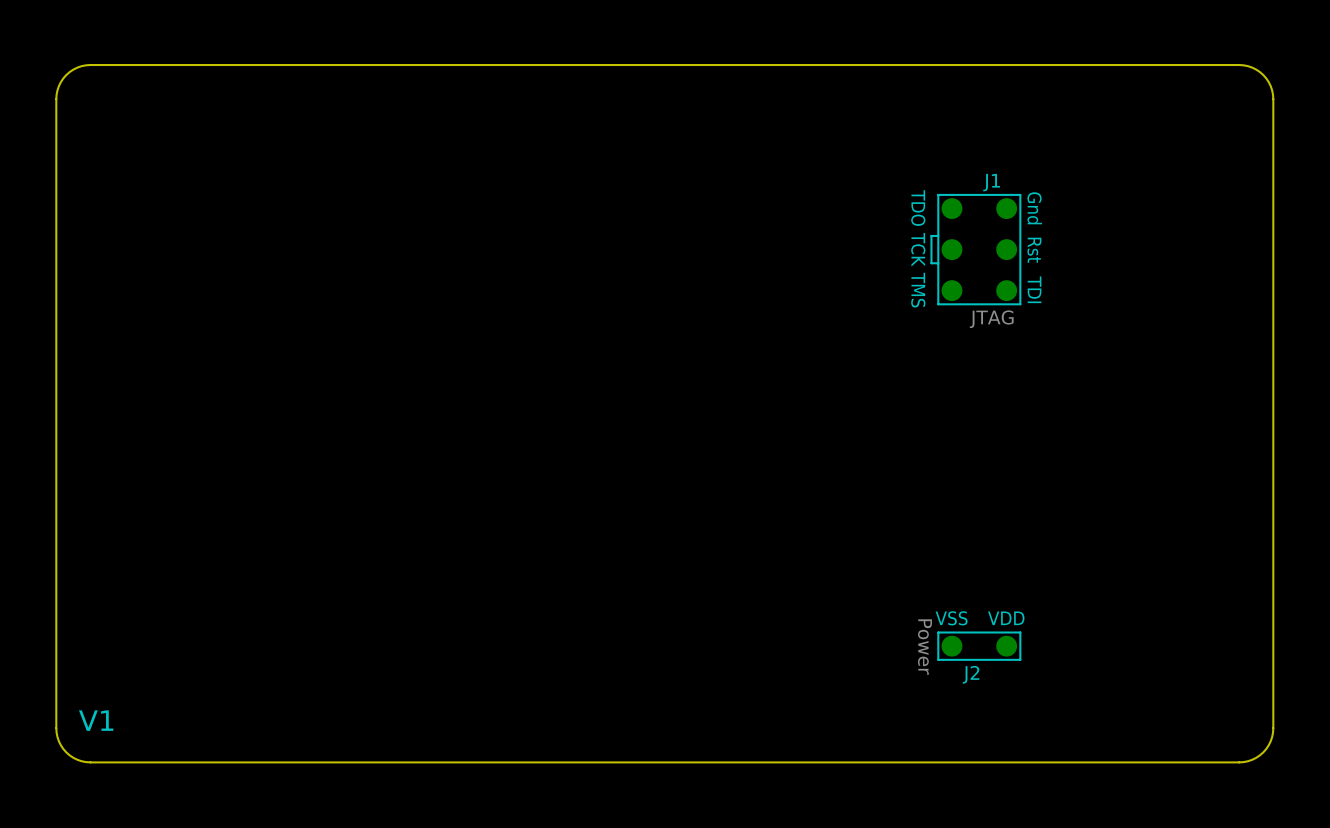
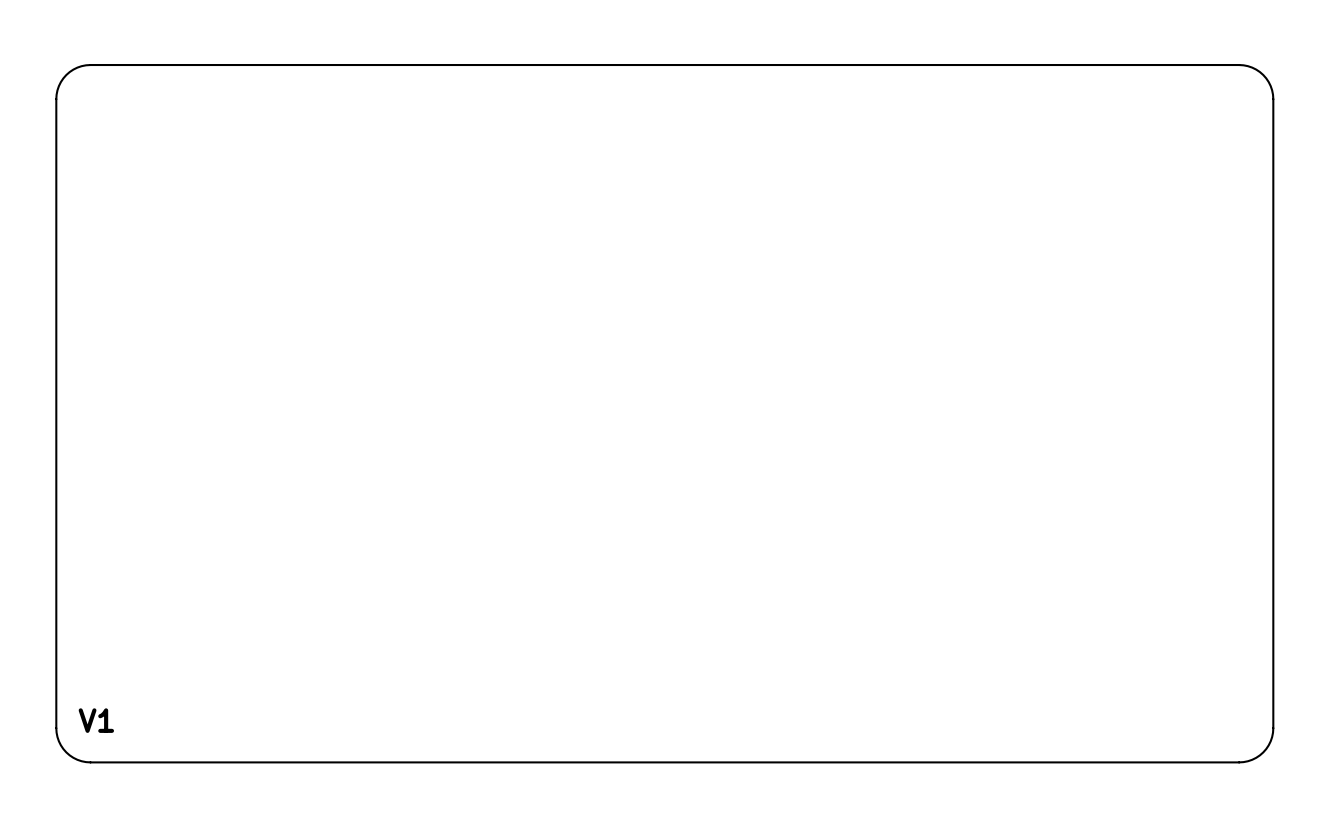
J1: JTAG (975, 249) -> none
J2: Power (979, 646) -> none

